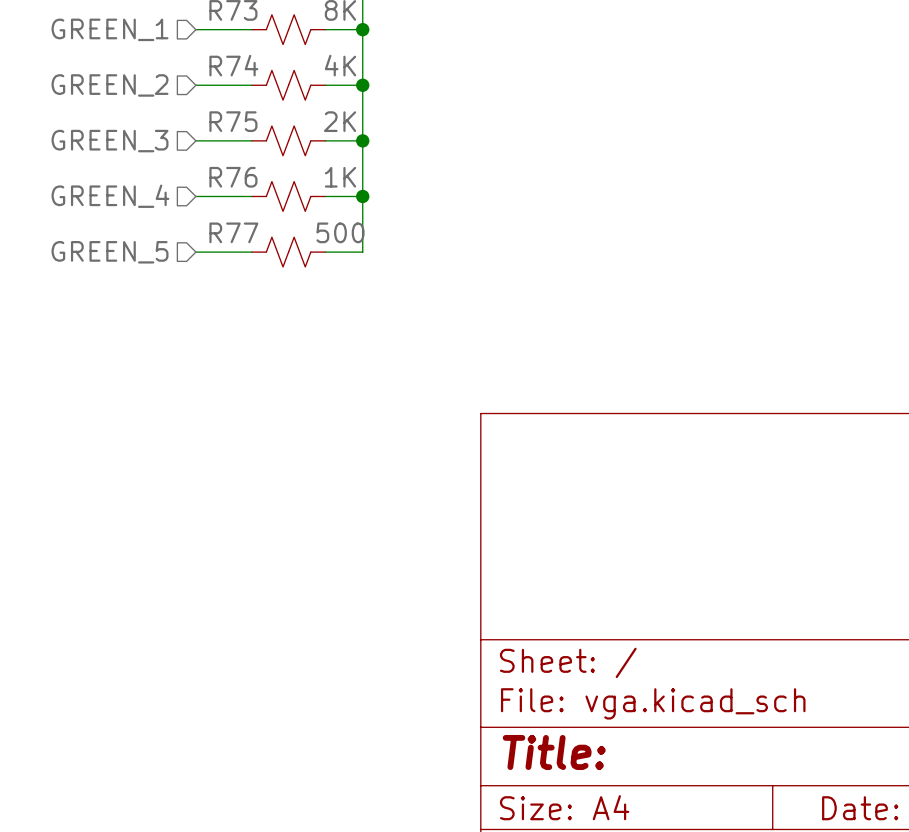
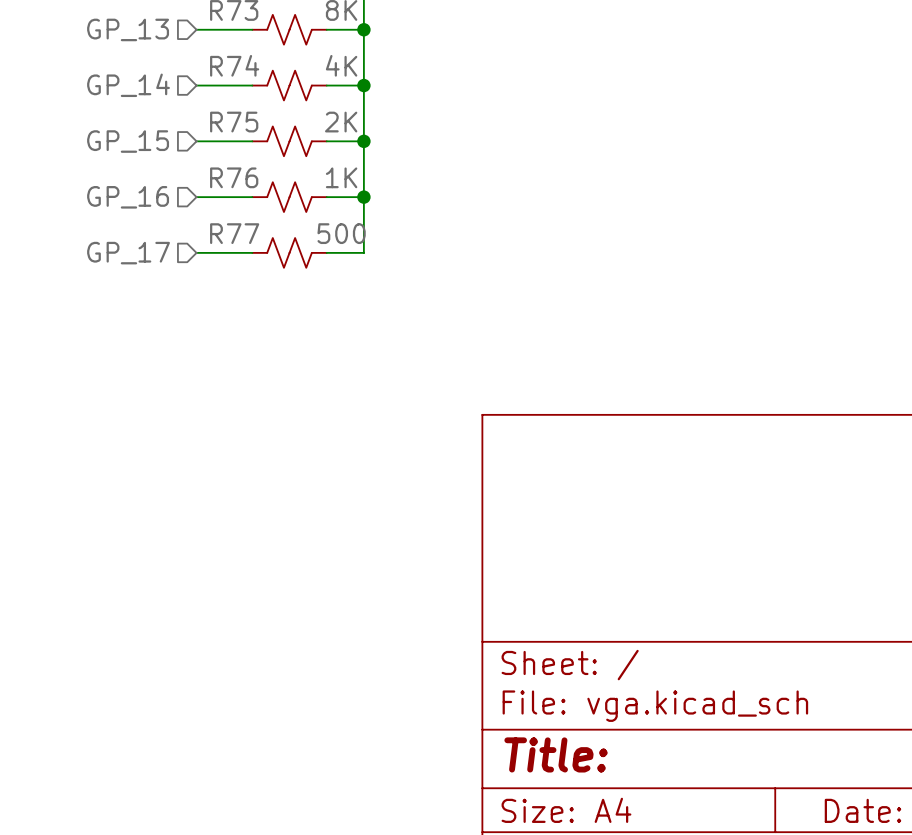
hierarchical label: GREEN_1 (110, 29) -> GP_13 (128, 29)
hierarchical label: GREEN_2 (110, 85) -> GP_14 (128, 85)
hierarchical label: GREEN_3 (110, 141) -> GP_15 (128, 141)
hierarchical label: GREEN_4 (110, 196) -> GP_16 (128, 197)
hierarchical label: GREEN_5 (110, 252) -> GP_17 (128, 253)

